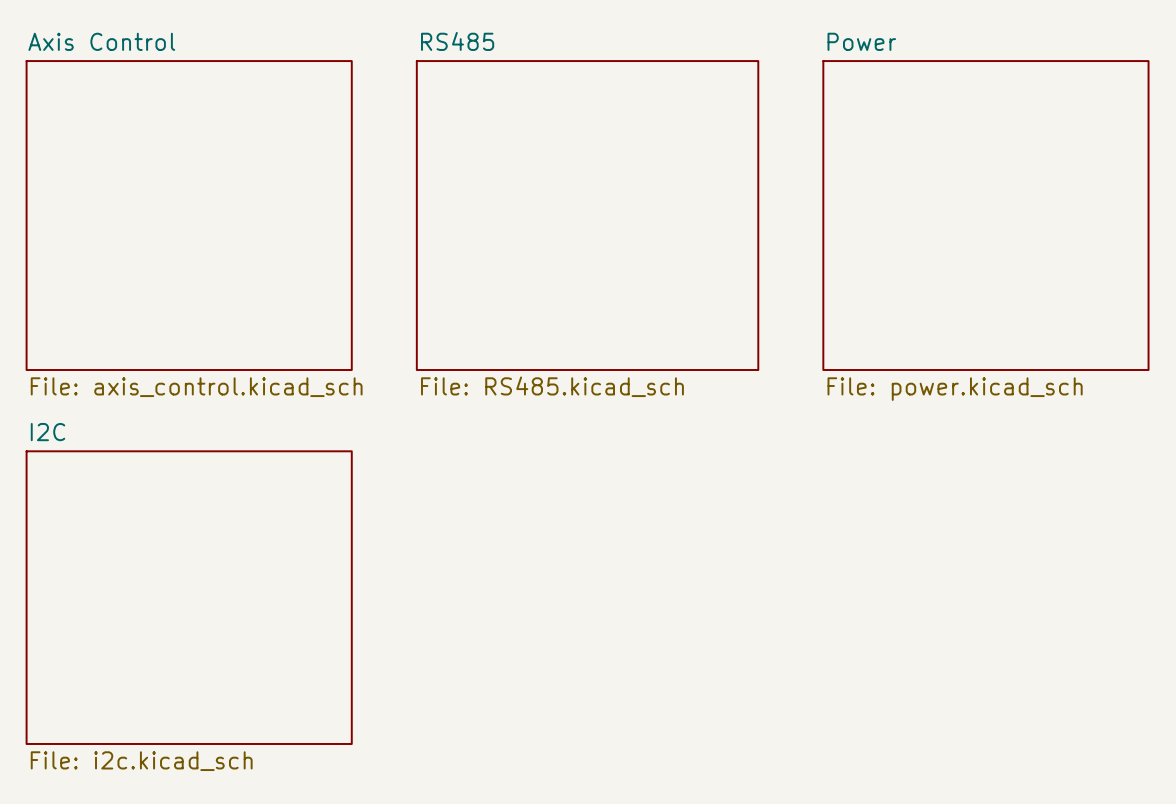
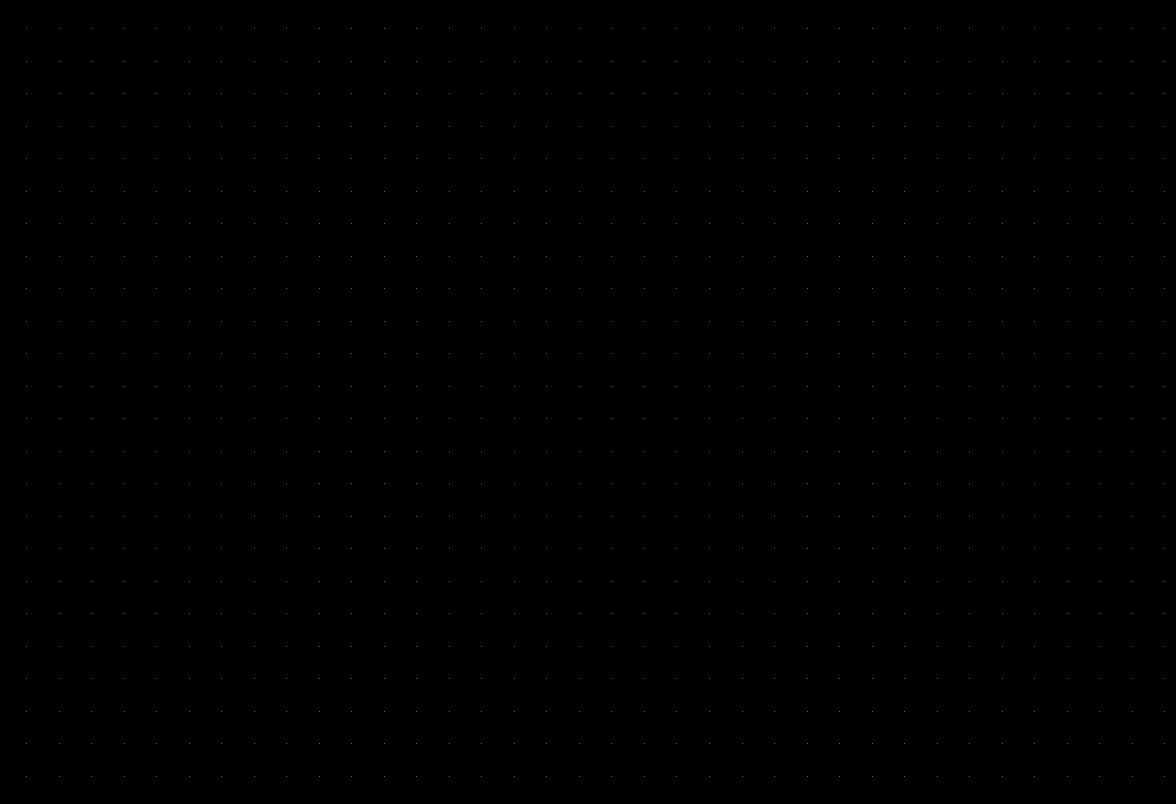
sheet Axis Control: File: axis_control.kicad_sch (189, 215) -> none
sheet RS485: File: RS485.kicad_sch (587, 215) -> none
sheet Power: File: power.kicad_sch (985, 215) -> none
sheet I2C: File: i2c.kicad_sch (189, 597) -> none

